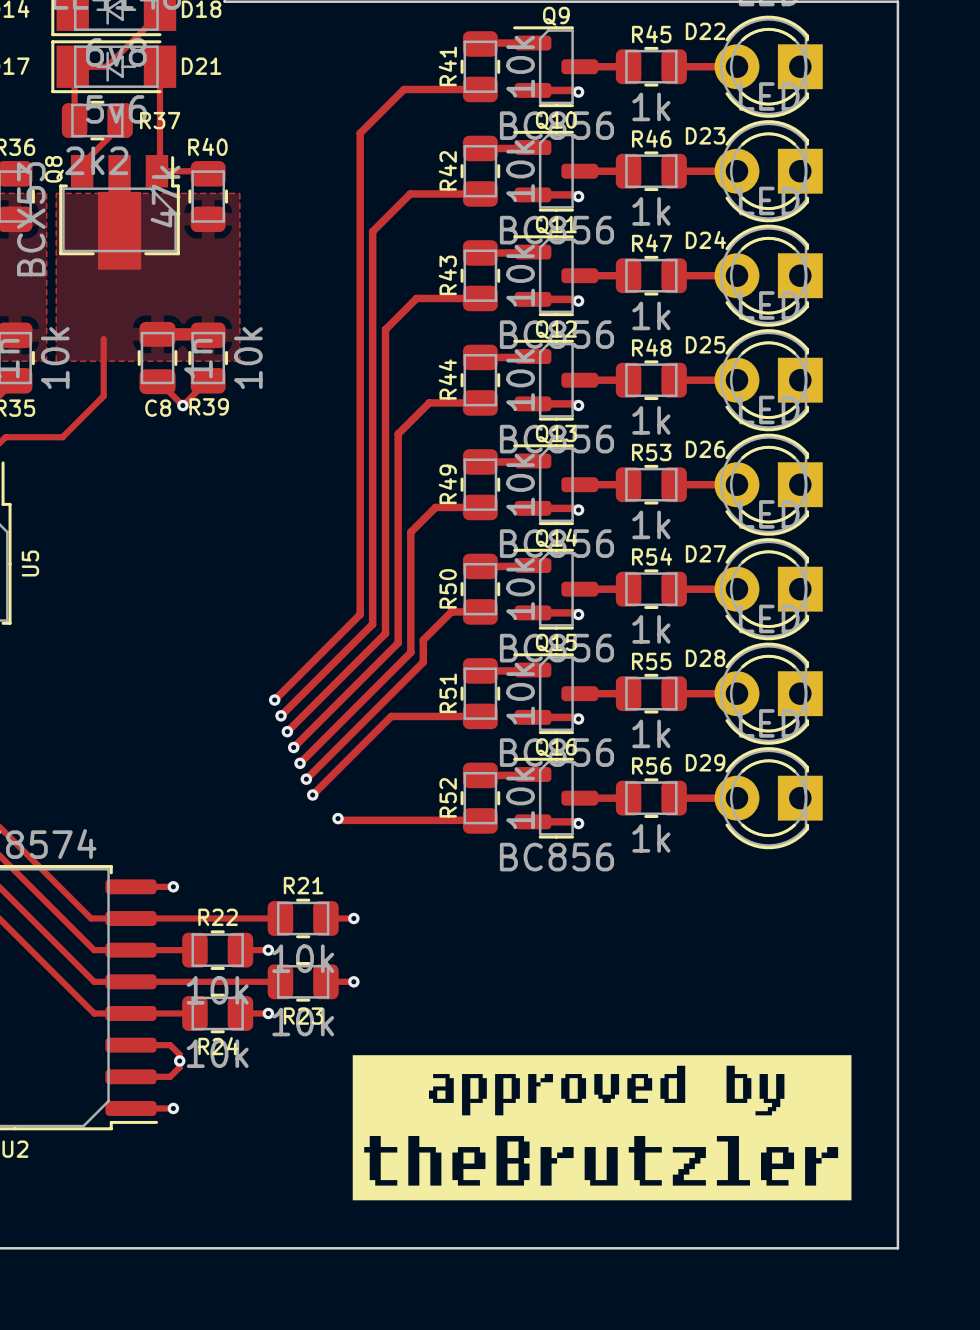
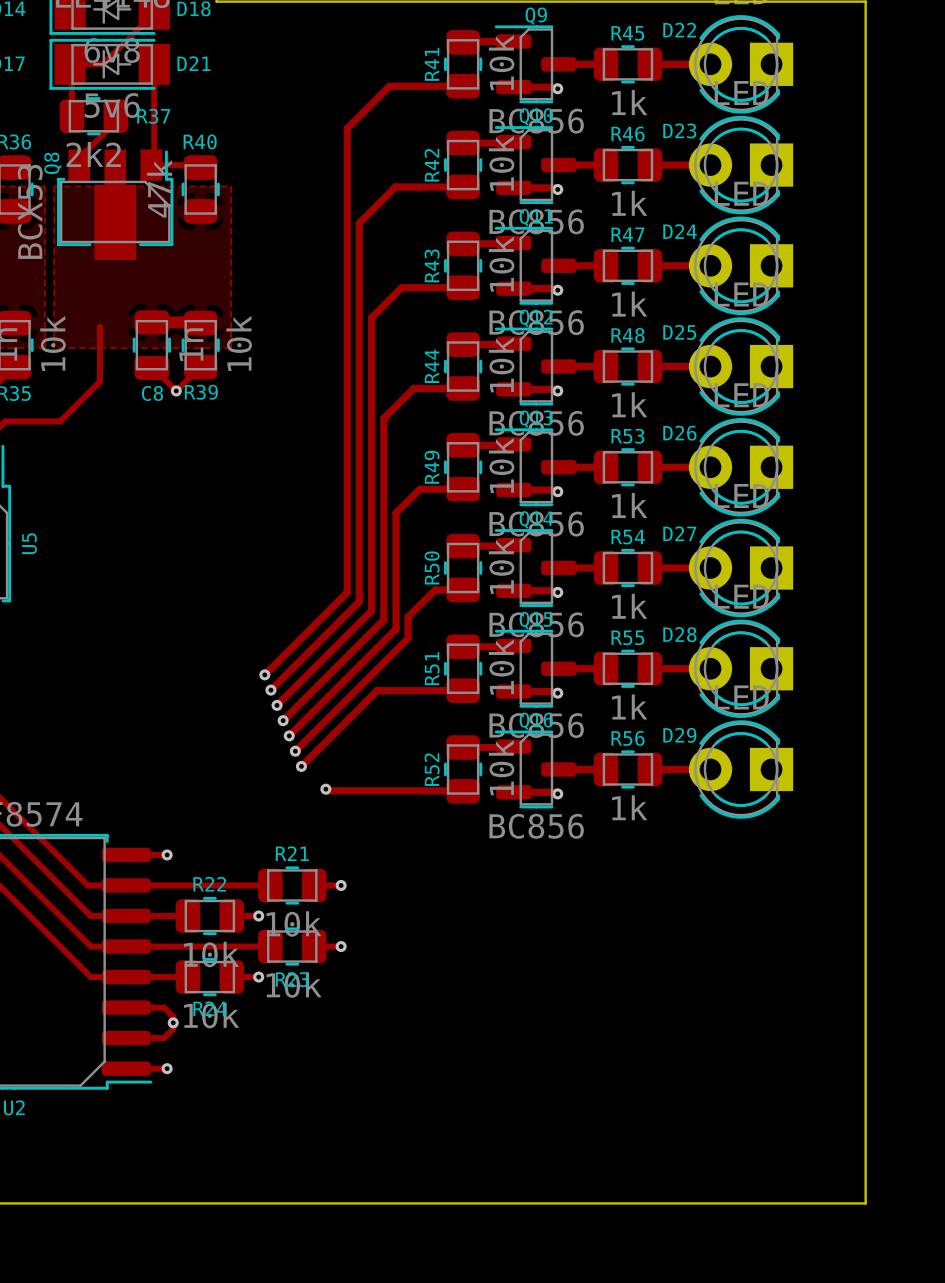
drawing: [352, 1055, 852, 1201] -> none

